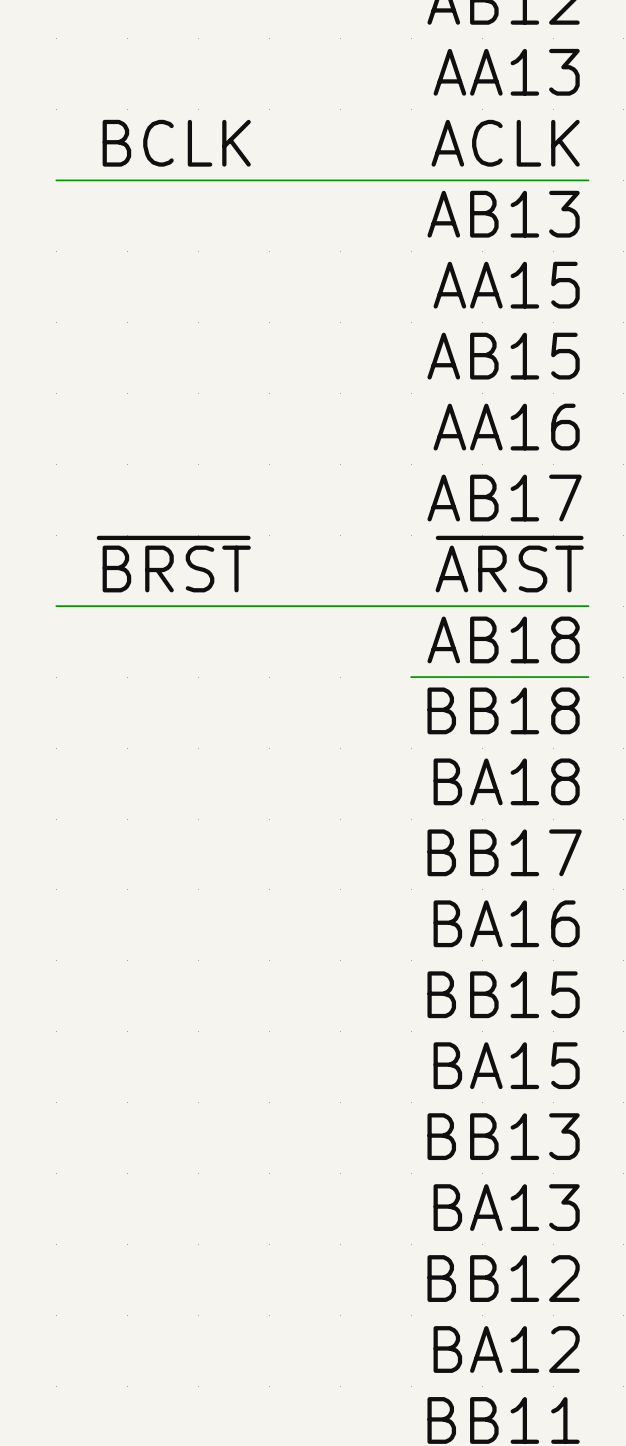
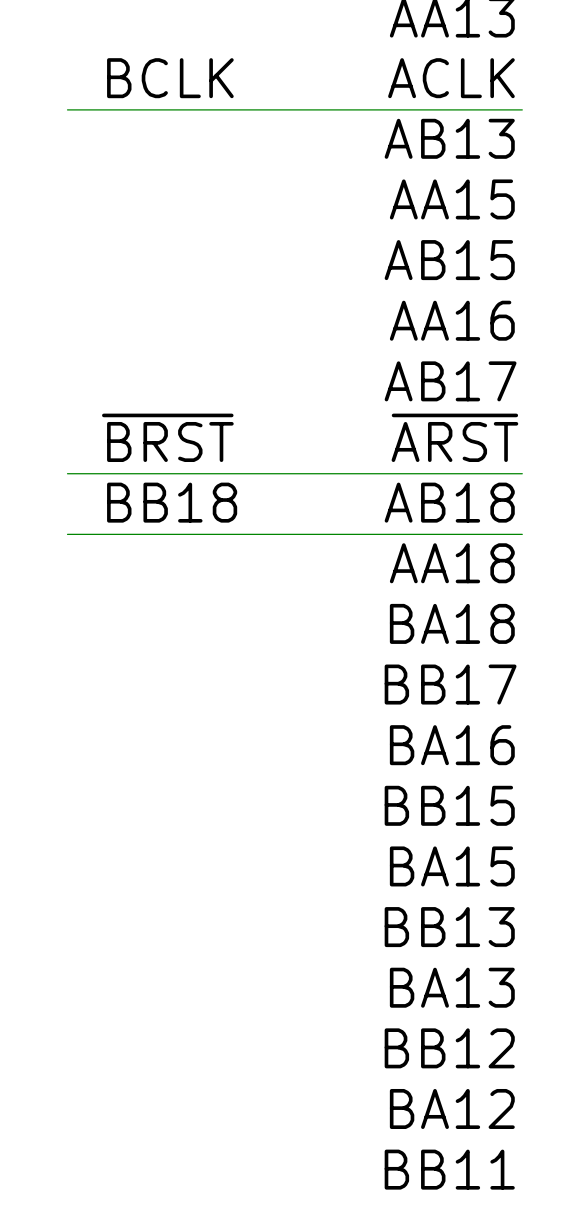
label: none -> BB18 (172, 502)
wire: none -> (67, 534) (370, 534)
label: BB18 (503, 710) -> AA18 (452, 563)

